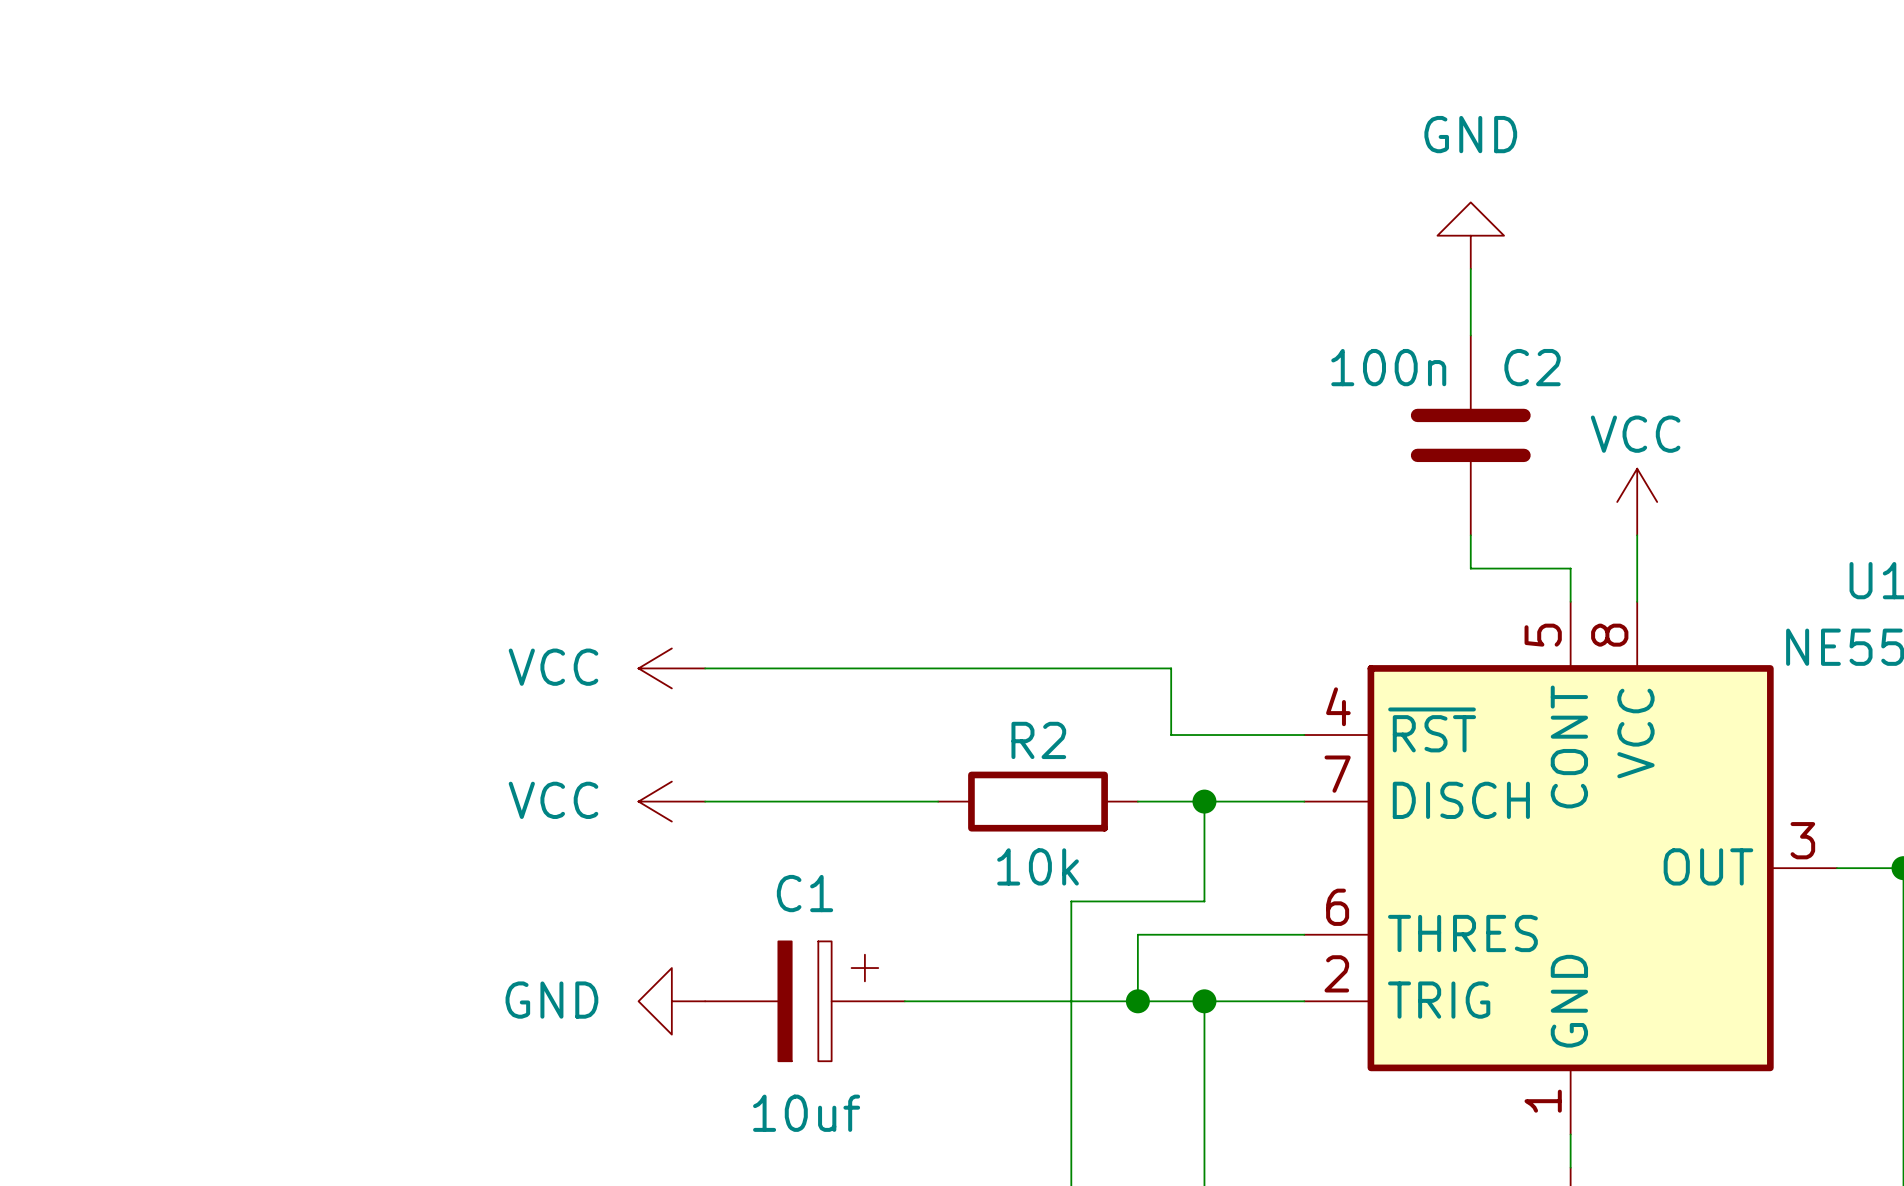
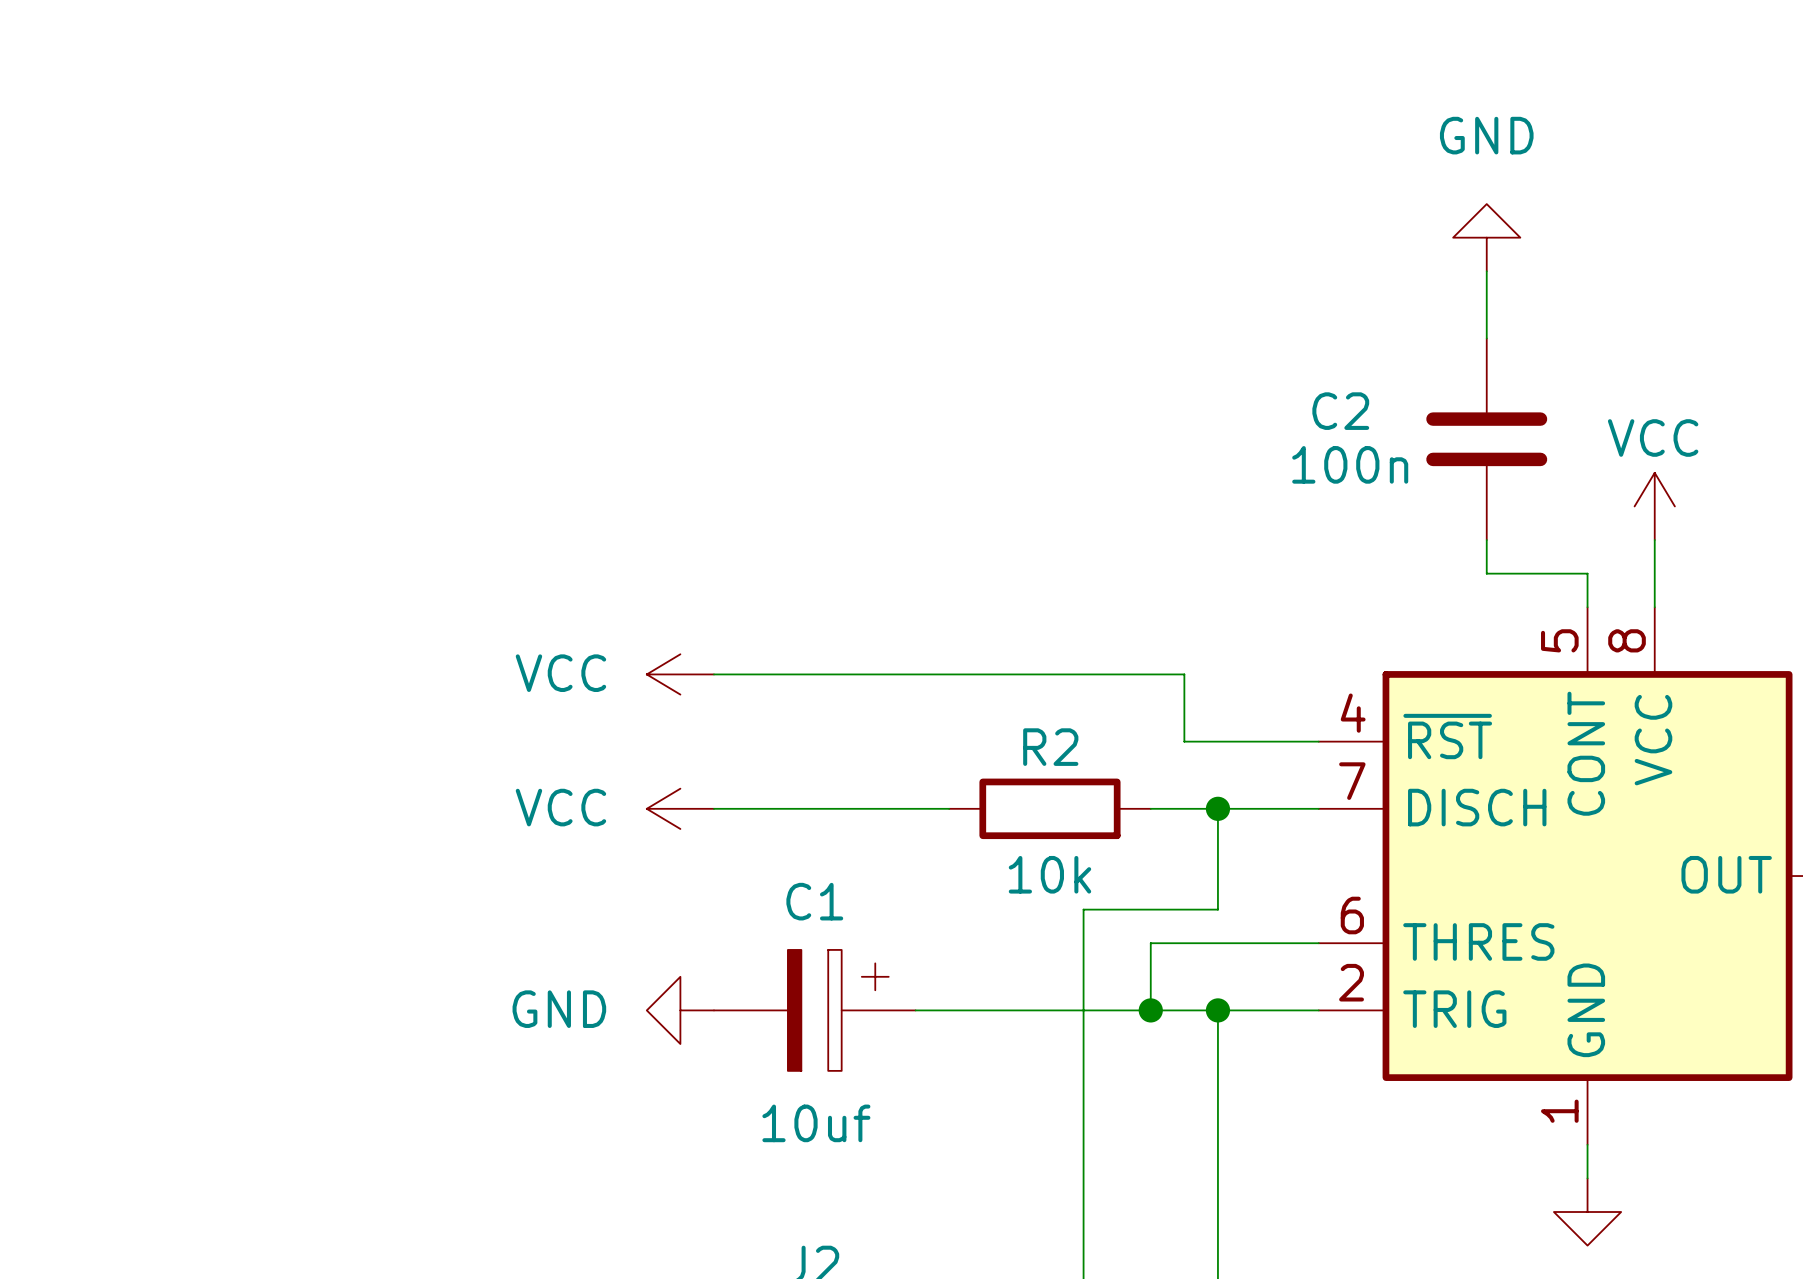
C2 value position: 100n (1388, 367) -> 100n (1350, 464)
C2 name position: C2 (1532, 367) -> C2 (1340, 411)

